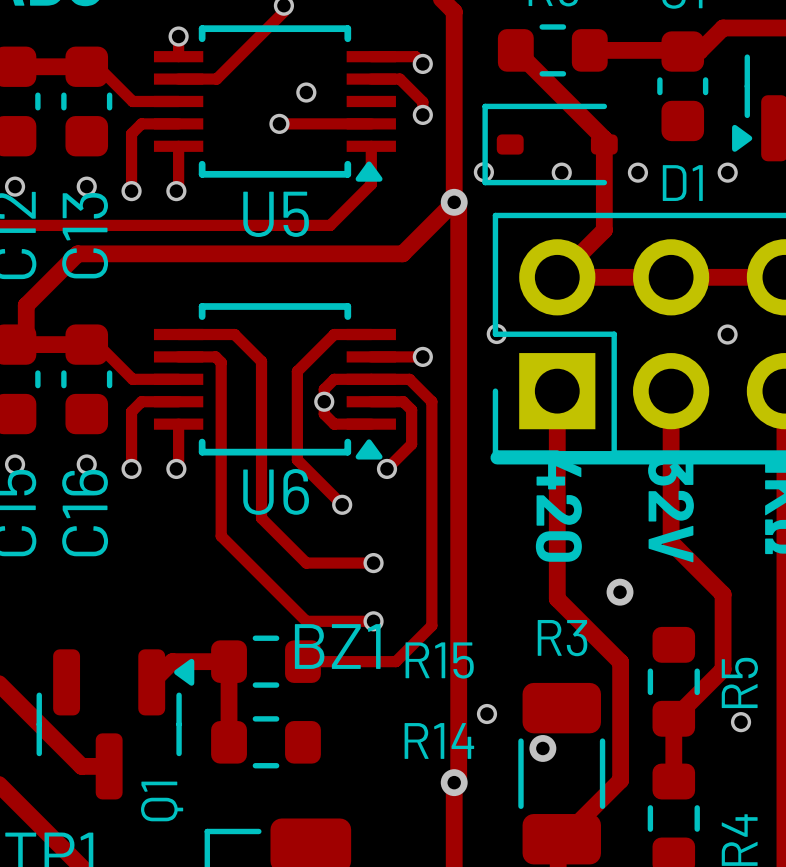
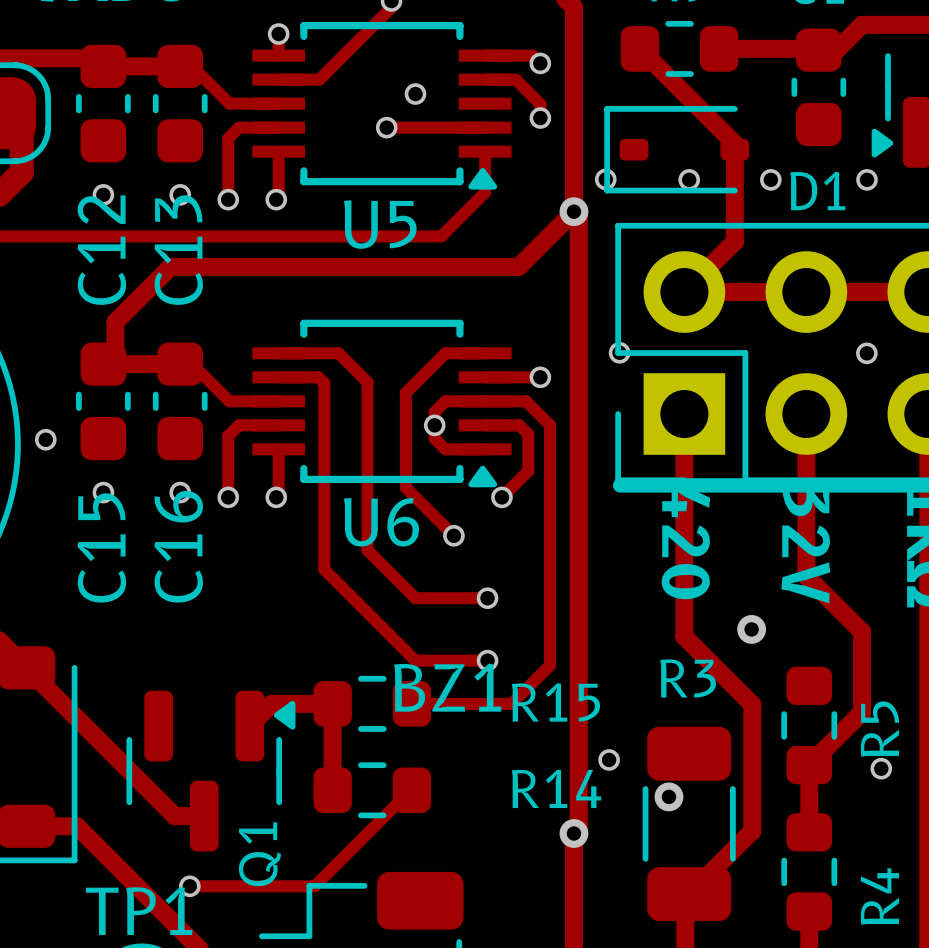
track: none -> (411, 790) (314, 886) (189, 886)
via: none -> (189, 886)

